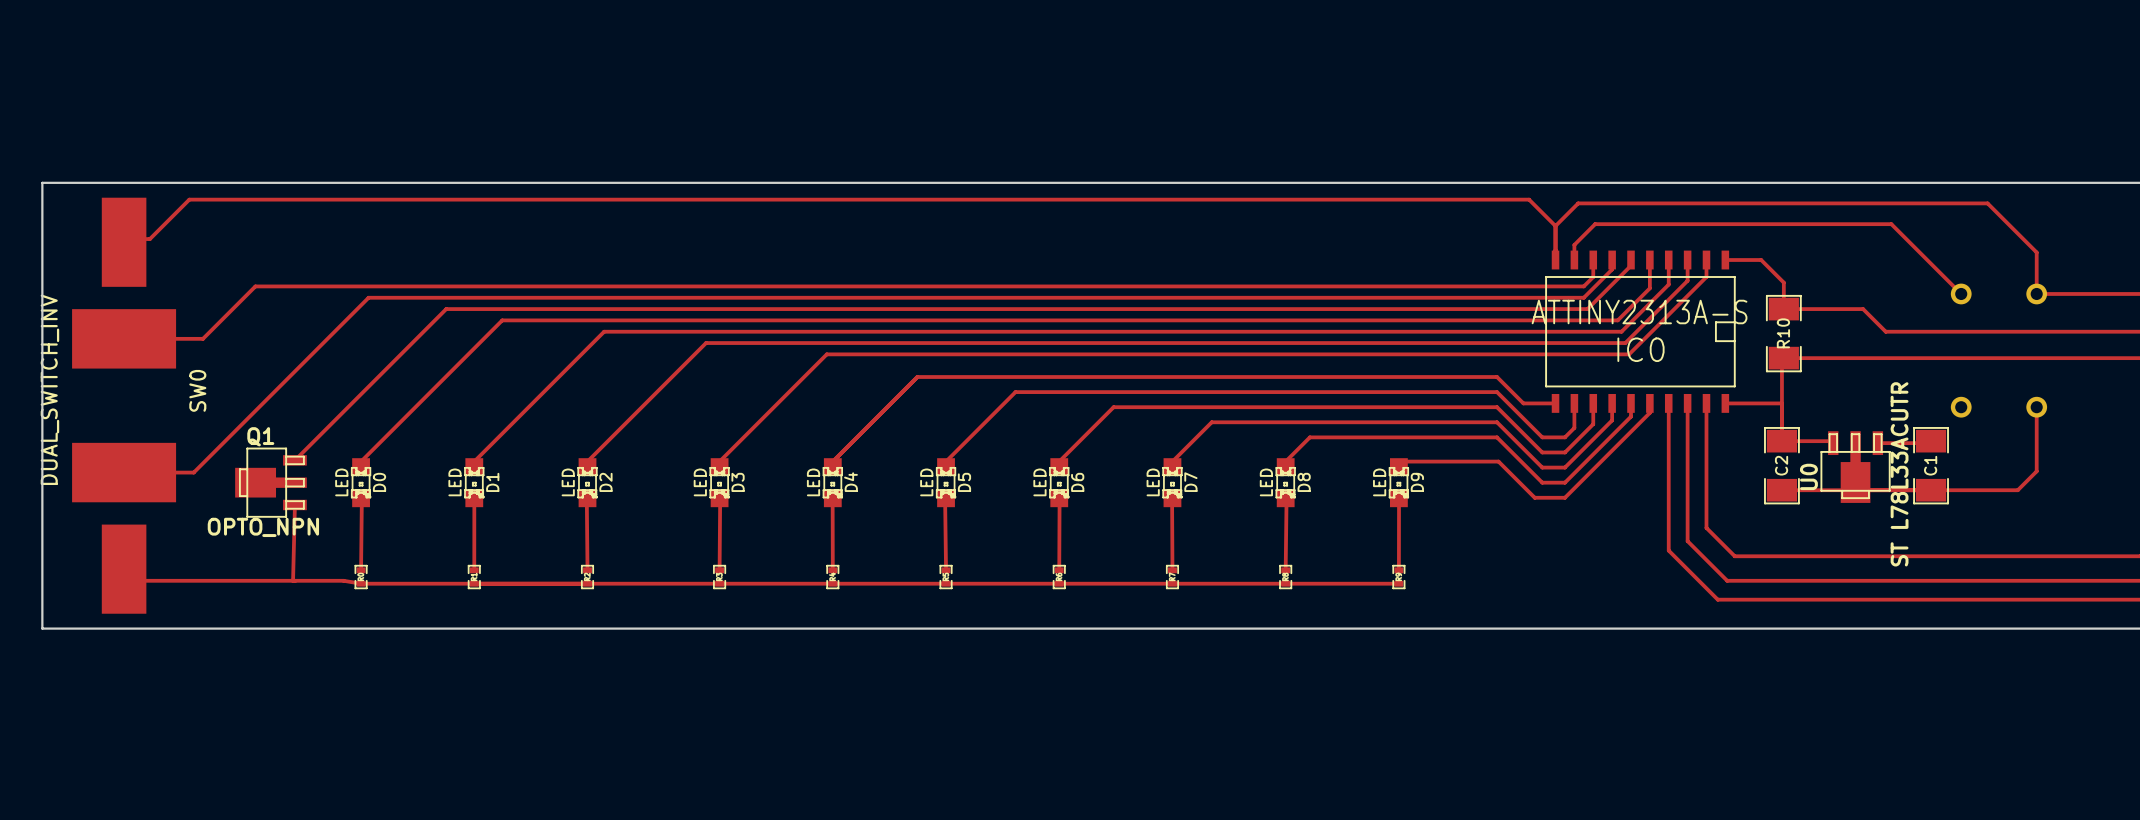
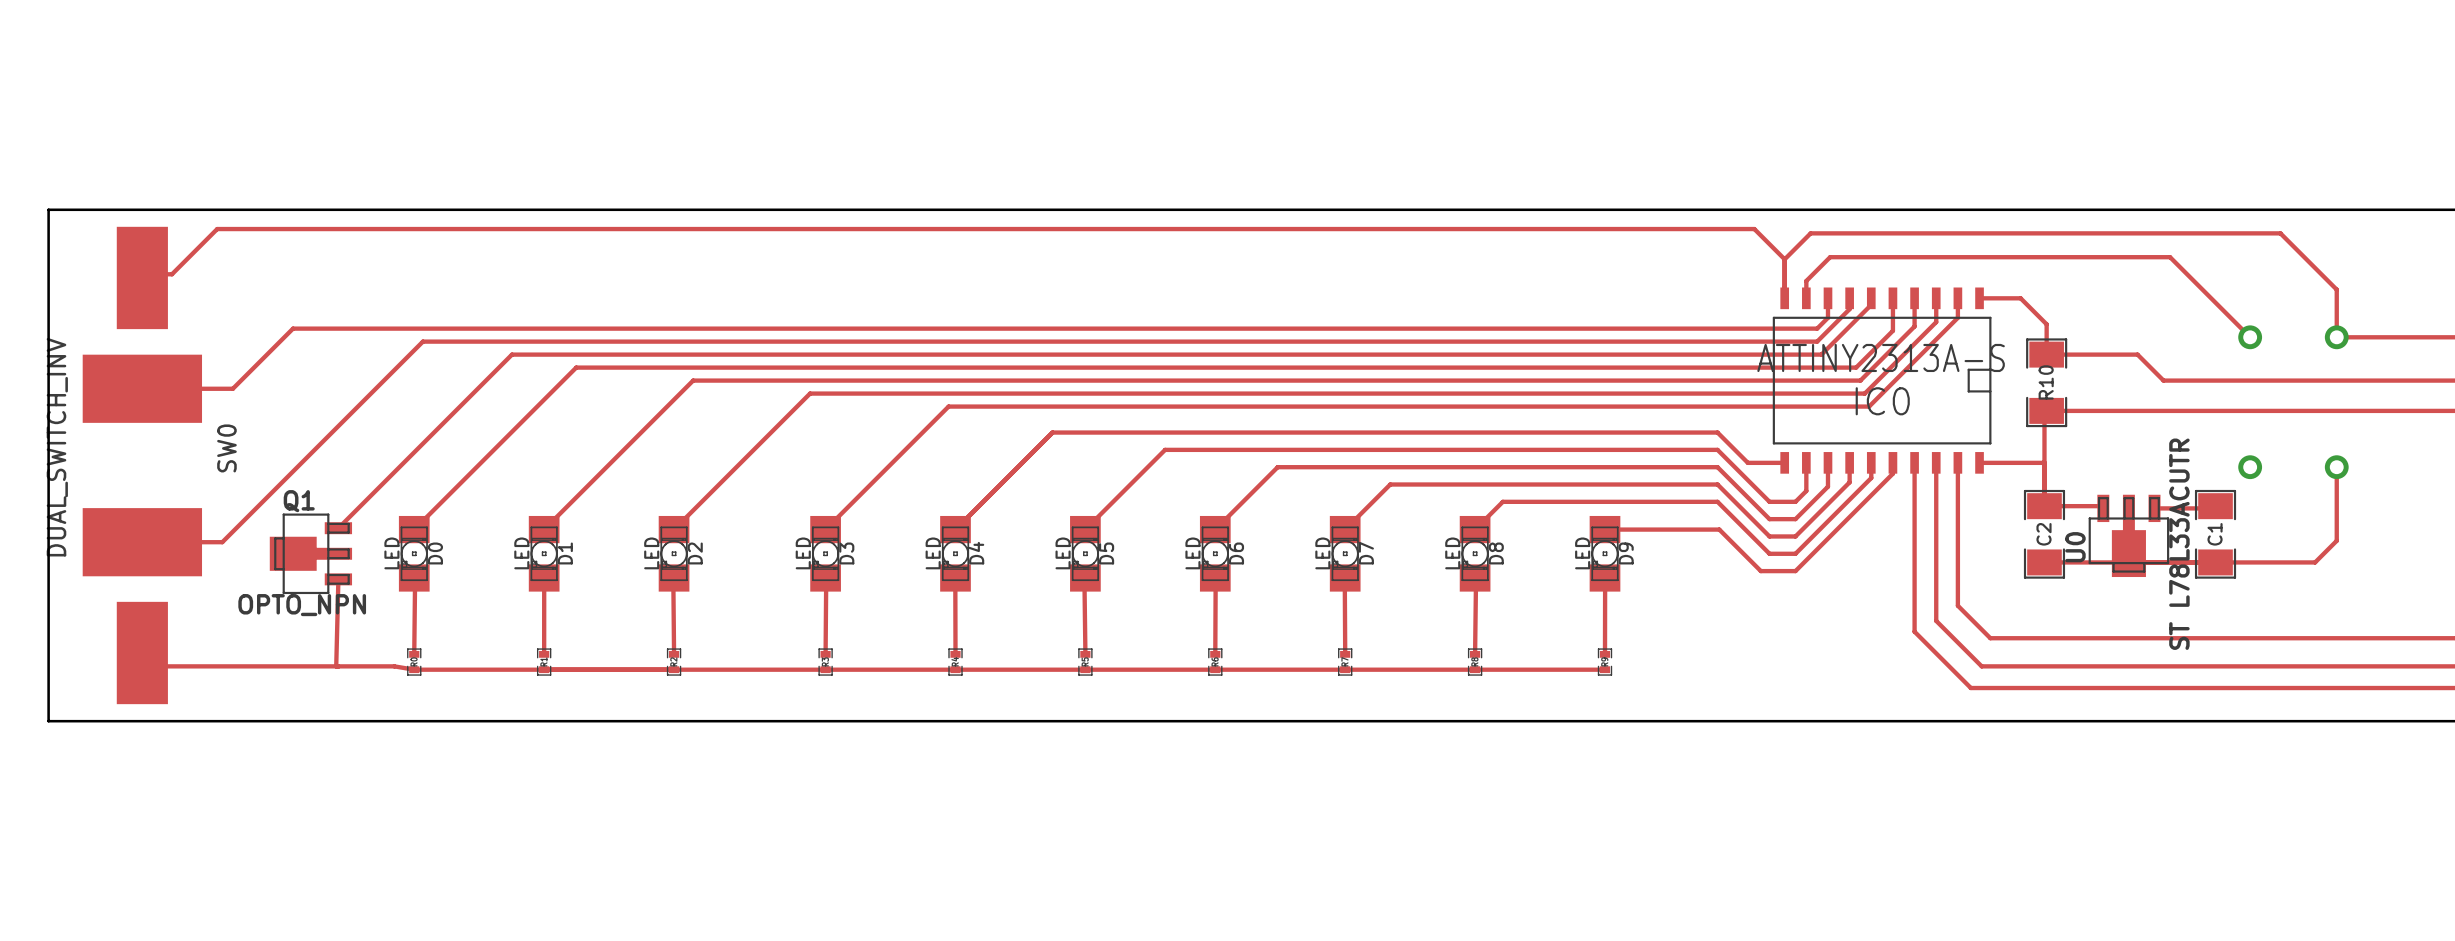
D0 footprint: [351, 458, 371, 508] -> [398, 515, 430, 592]
D1 footprint: [464, 458, 485, 508] -> [528, 515, 560, 592]
D2 footprint: [577, 458, 598, 508] -> [658, 515, 690, 592]
D3 footprint: [709, 458, 730, 508] -> [810, 515, 841, 592]
D4 footprint: [823, 458, 843, 508] -> [940, 515, 971, 592]
D5 footprint: [936, 458, 956, 508] -> [1070, 515, 1101, 592]
D6 footprint: [1049, 458, 1070, 508] -> [1199, 515, 1231, 592]
D7 footprint: [1162, 458, 1183, 508] -> [1329, 515, 1361, 592]
D8 footprint: [1275, 458, 1296, 508] -> [1459, 515, 1491, 592]
D9 footprint: [1389, 458, 1409, 508] -> [1589, 515, 1621, 592]

